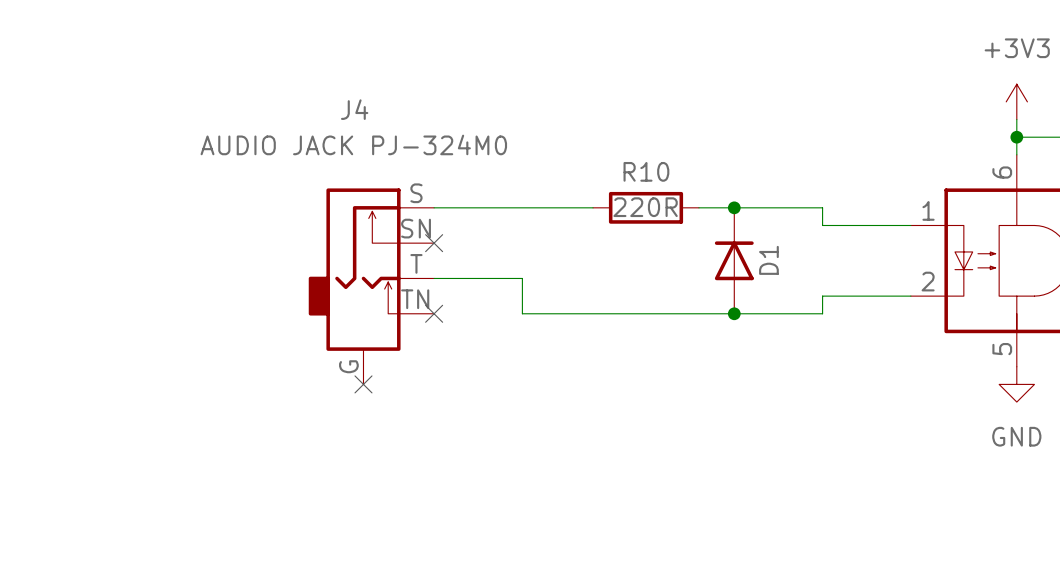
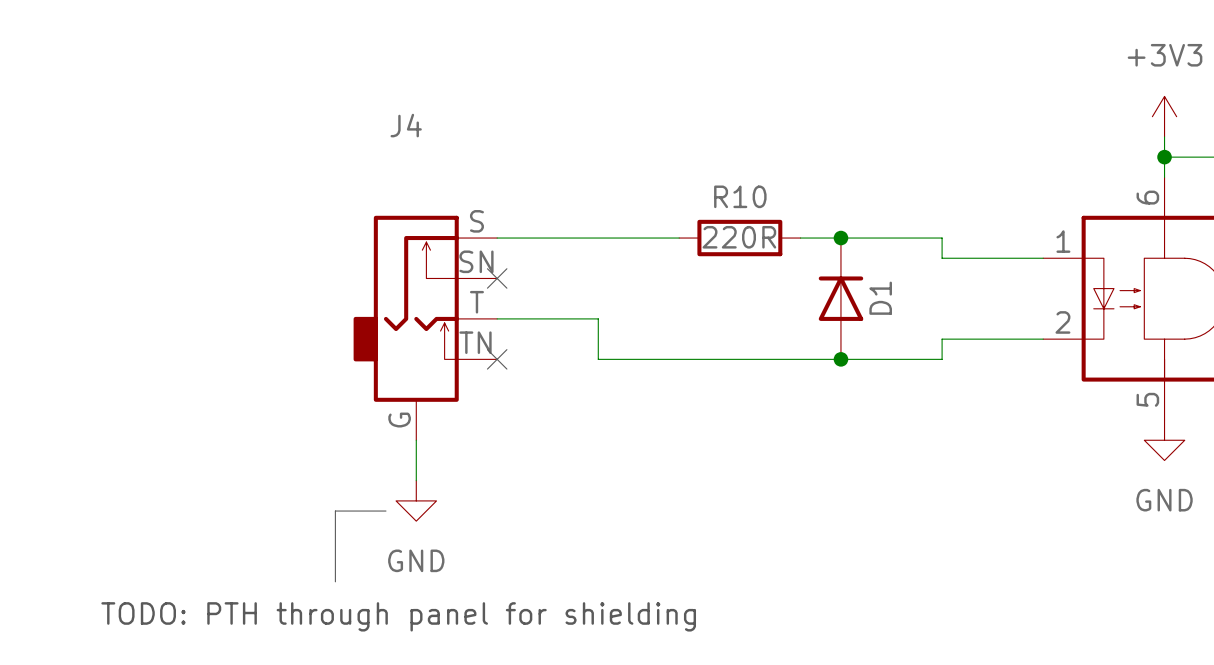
J4 value: AUDIO JACK PJ-324M0 (353, 144) -> none
wire: none -> (416, 440) (416, 480)
no-connect mark: (363, 384) -> none
power symbol: none -> GND (416, 500)
line: none -> (385, 511) (335, 511) (335, 581)
text: none -> TODO: PTH through panel for shielding (398, 616)

